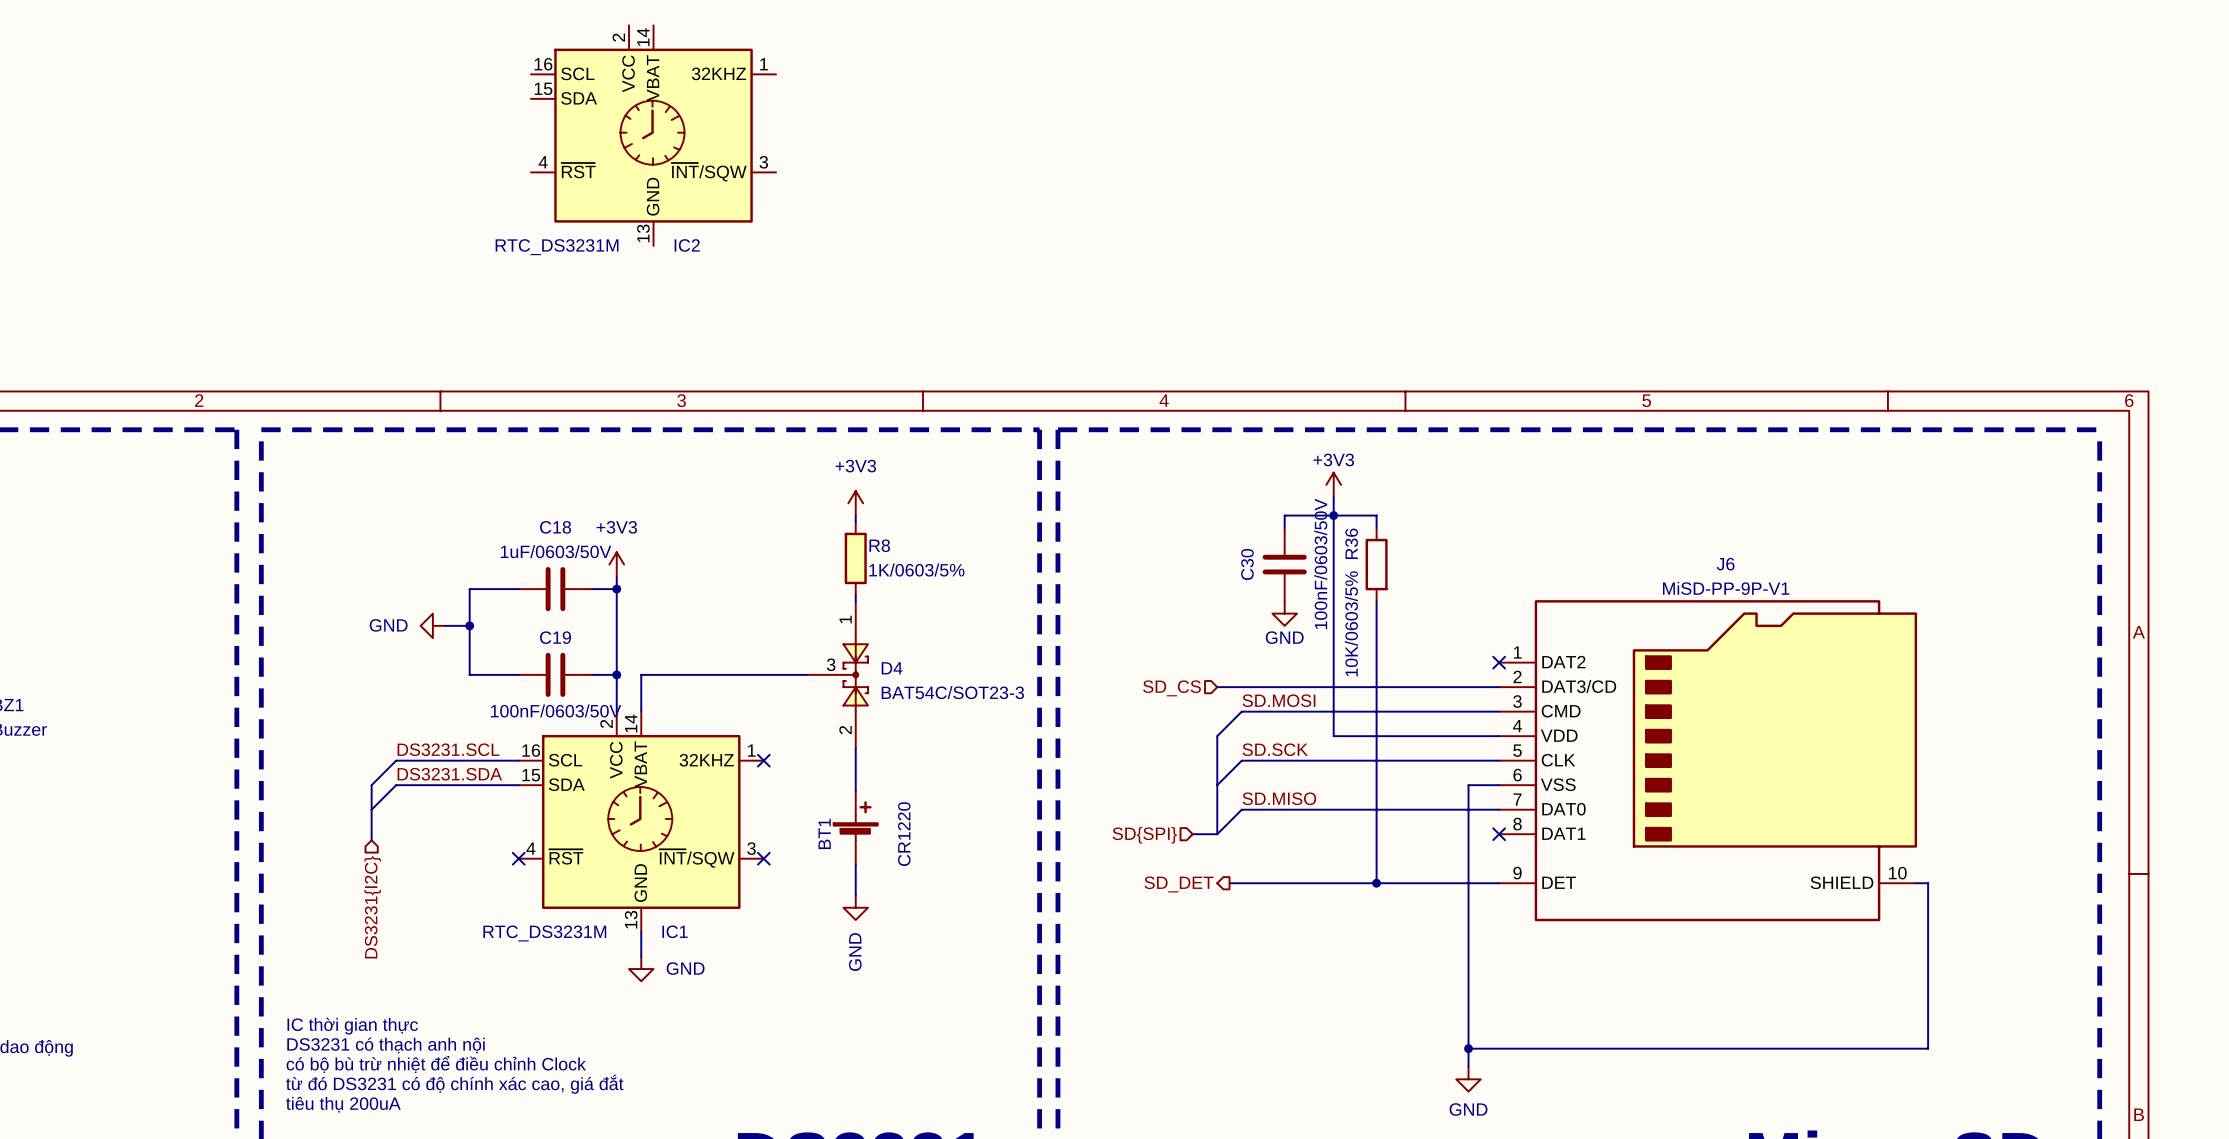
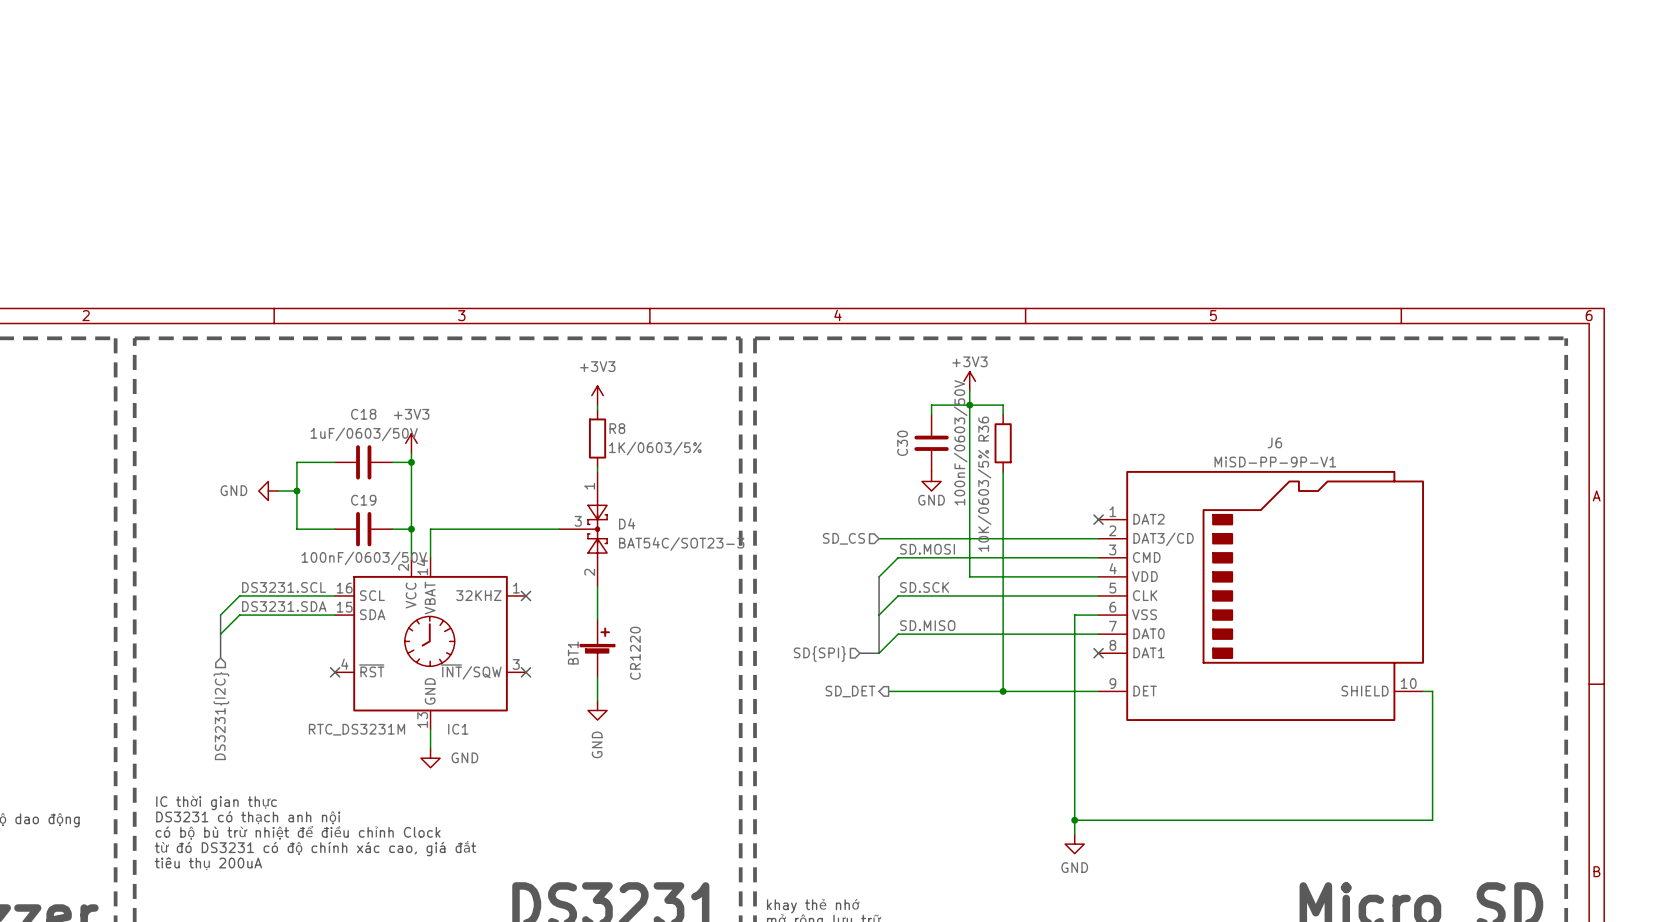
IC2: RTC_DS3231M (653, 135) -> none

